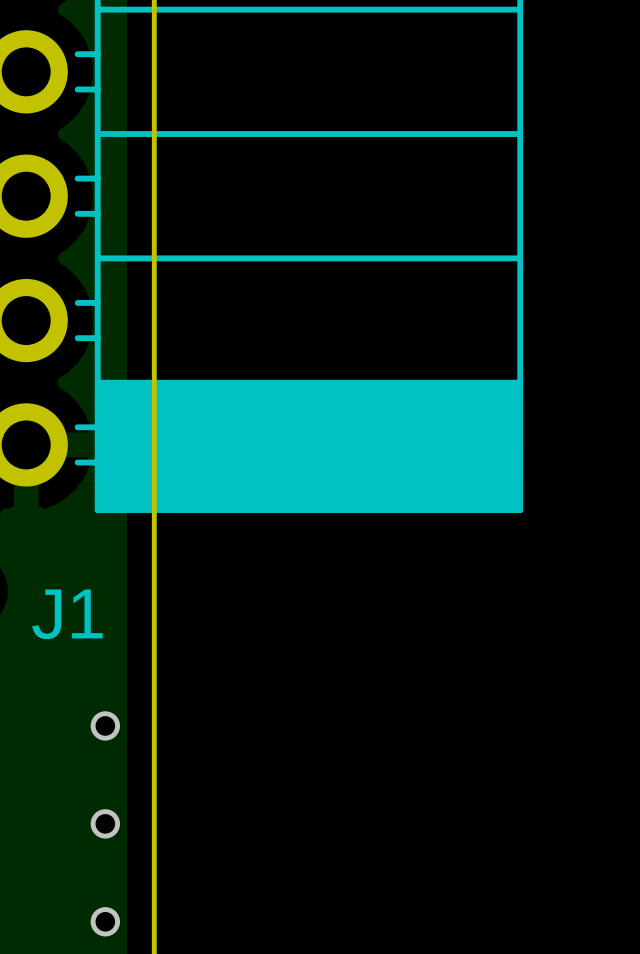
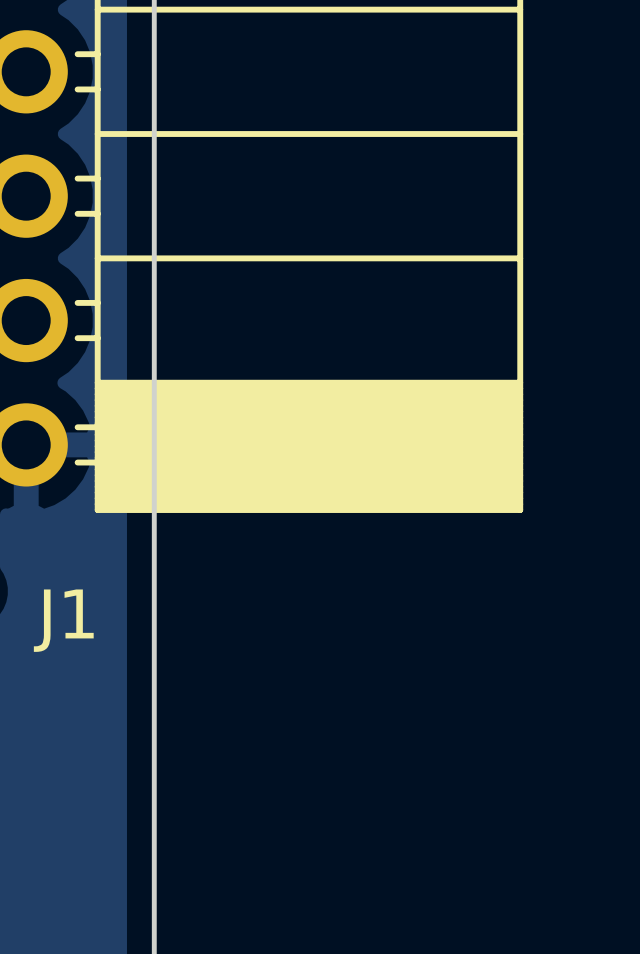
via: (105, 725) -> none
via: (105, 823) -> none
via: (105, 921) -> none

